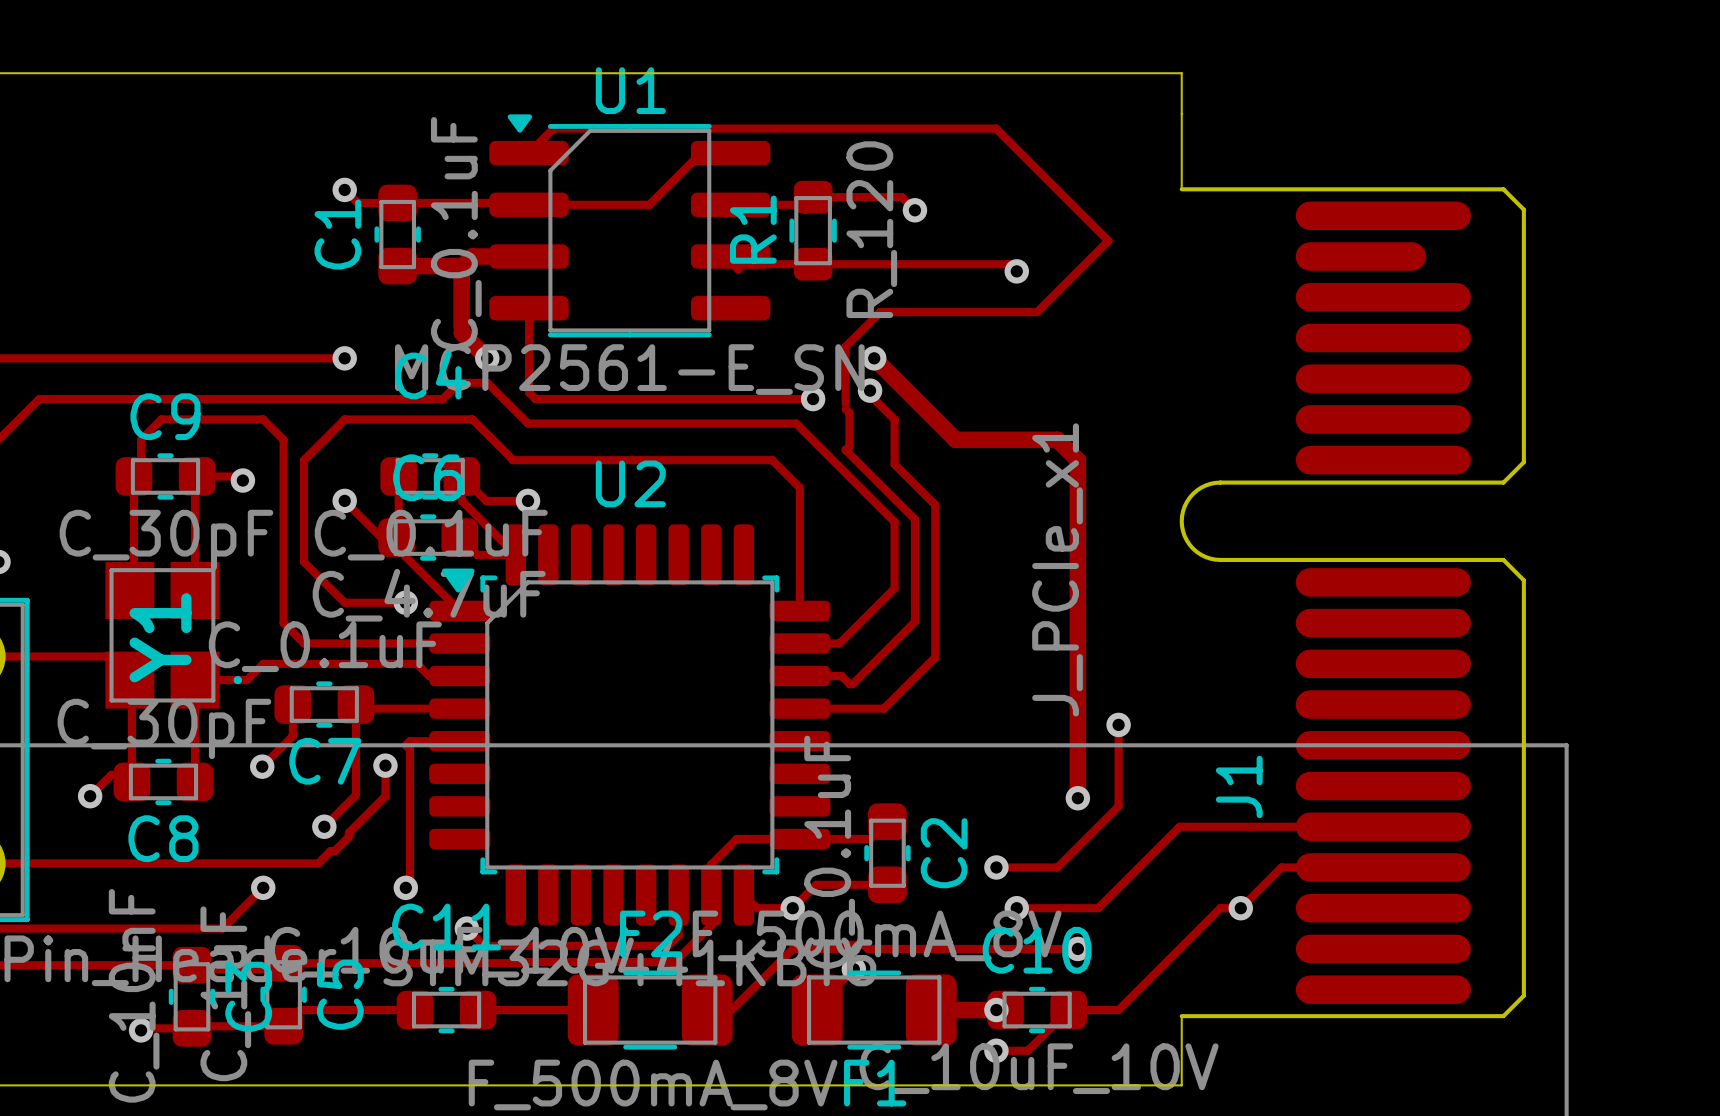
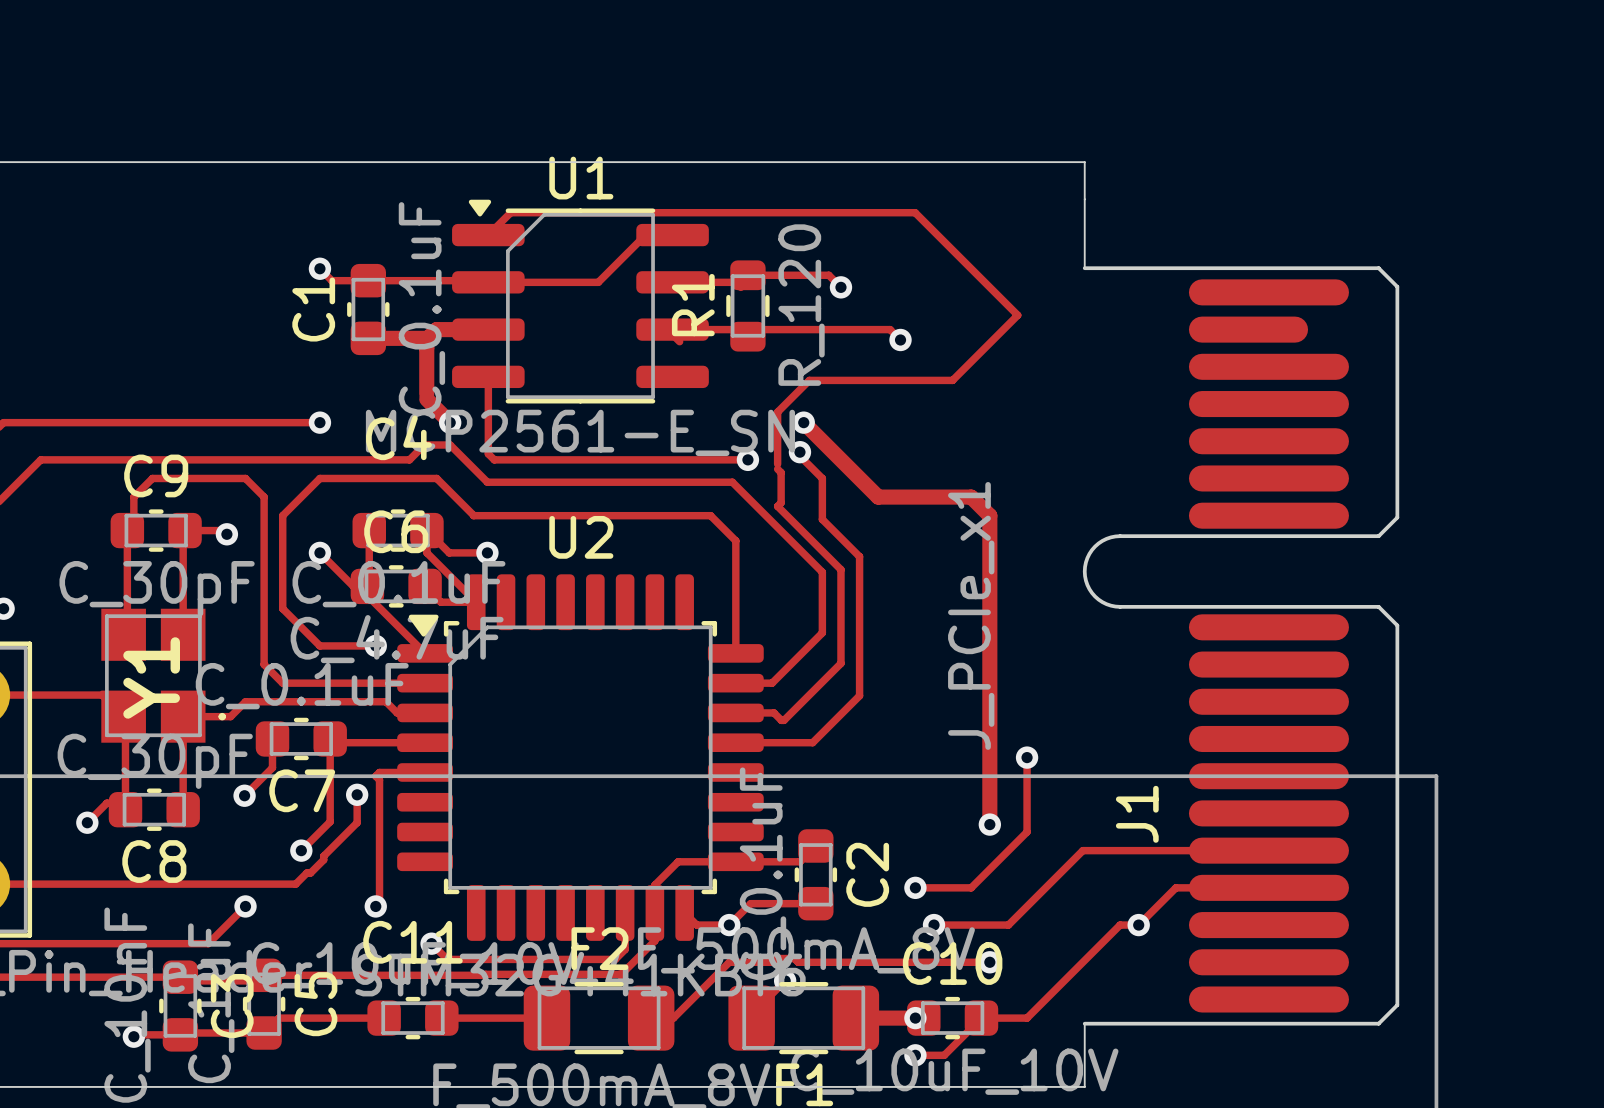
track: none -> (672, 329) (890, 329) (900, 339)
track: (738, 264) (1009, 264) (1016, 271) -> none
via position: (1016, 271) -> (900, 339)

